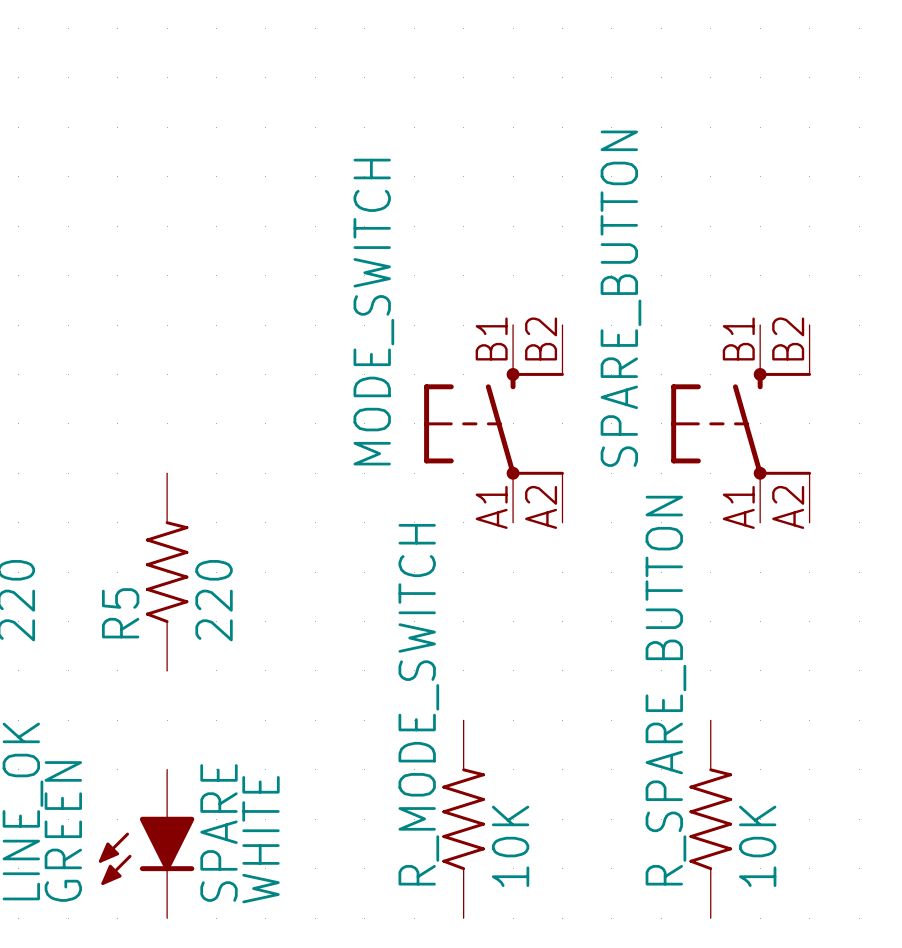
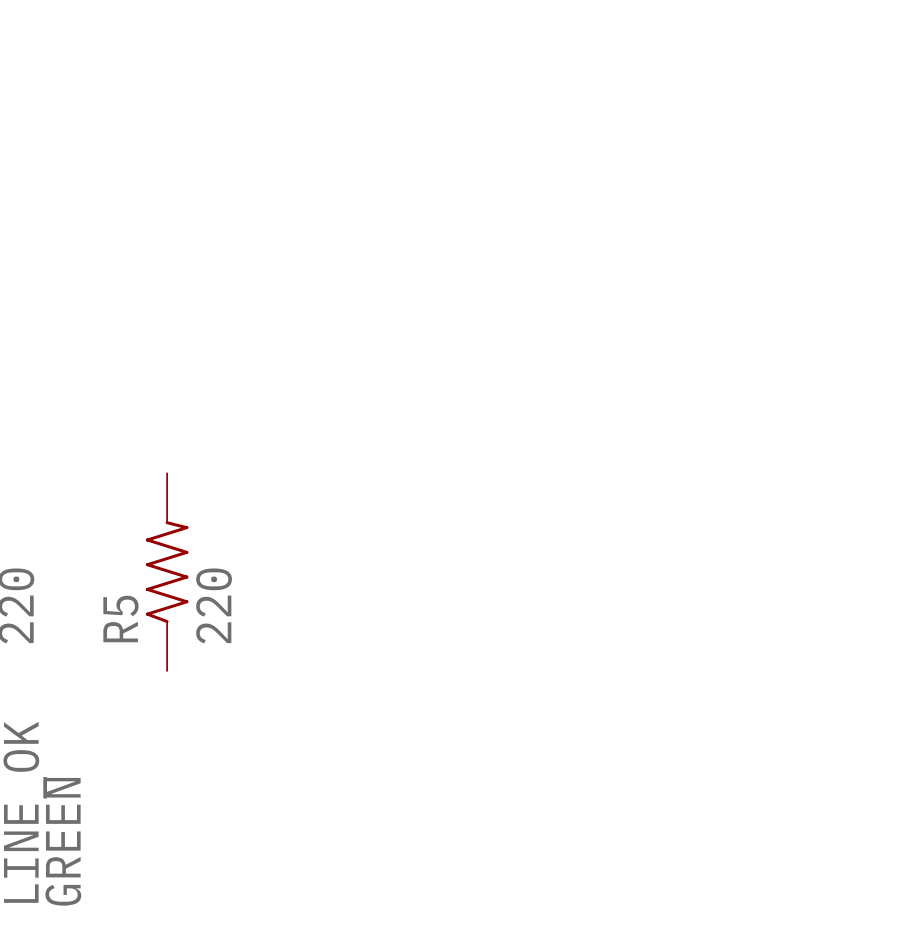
MODE_SWITCH: (494, 423) -> none
SPARE_BUTTON: (741, 423) -> none
R_MODE_SWITCH: 10K (463, 819) -> none
R_SPARE_BUTTON: 10K (710, 819) -> none
SPARE: WHITE (146, 843) -> none

